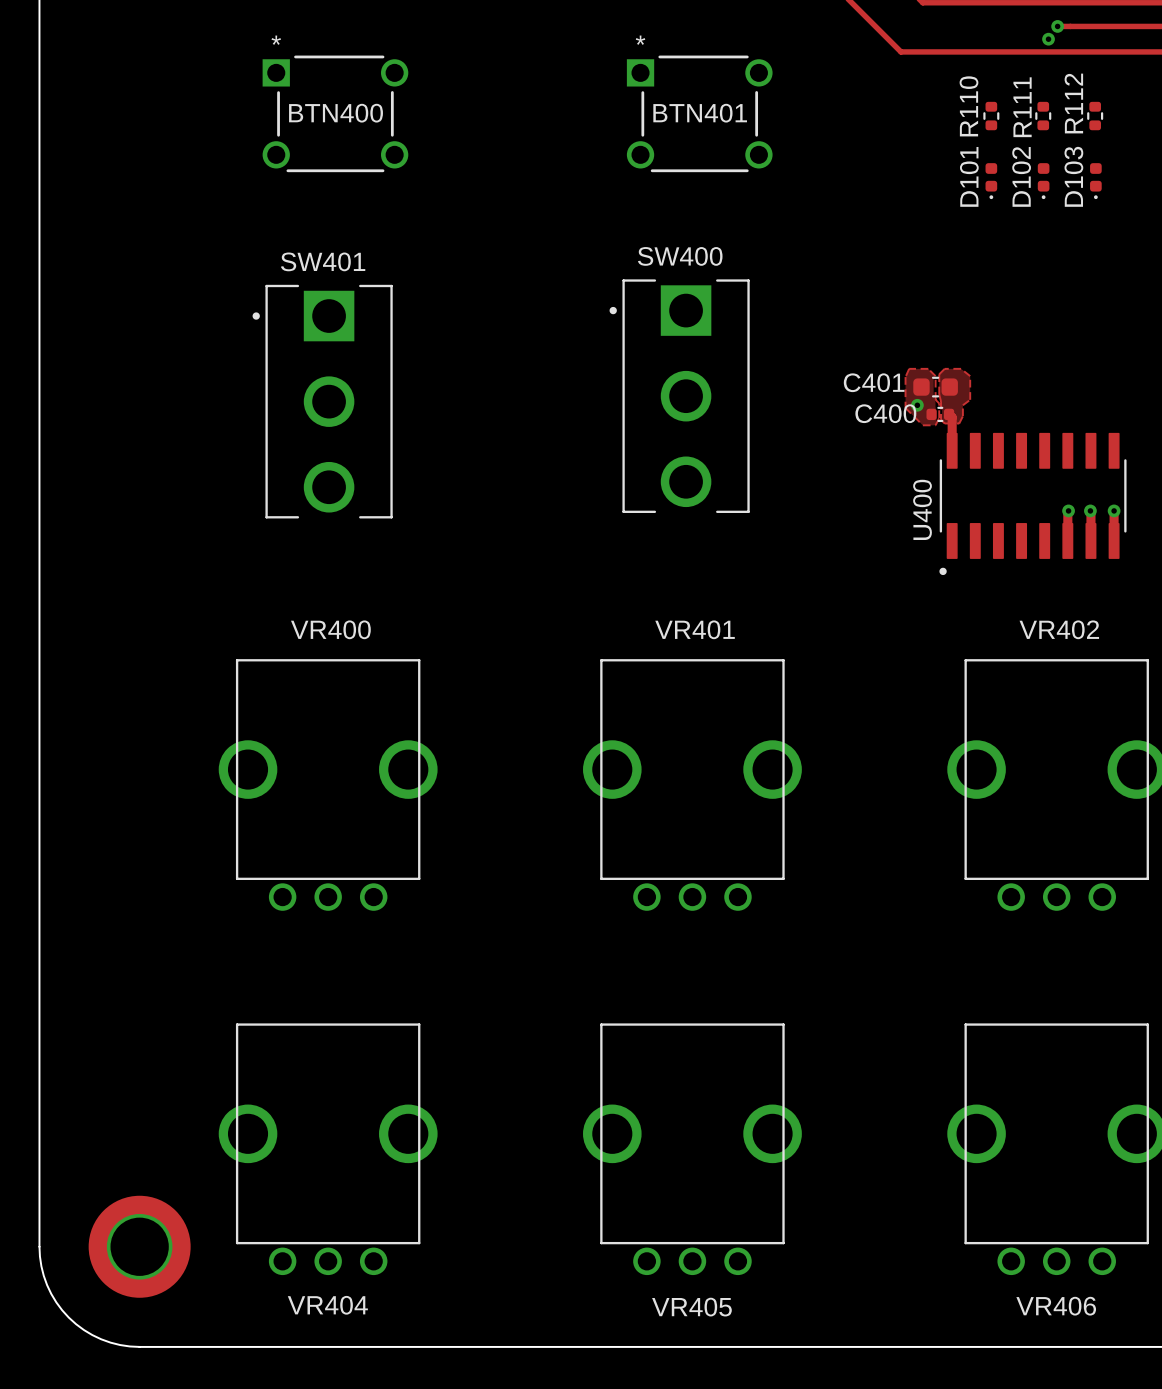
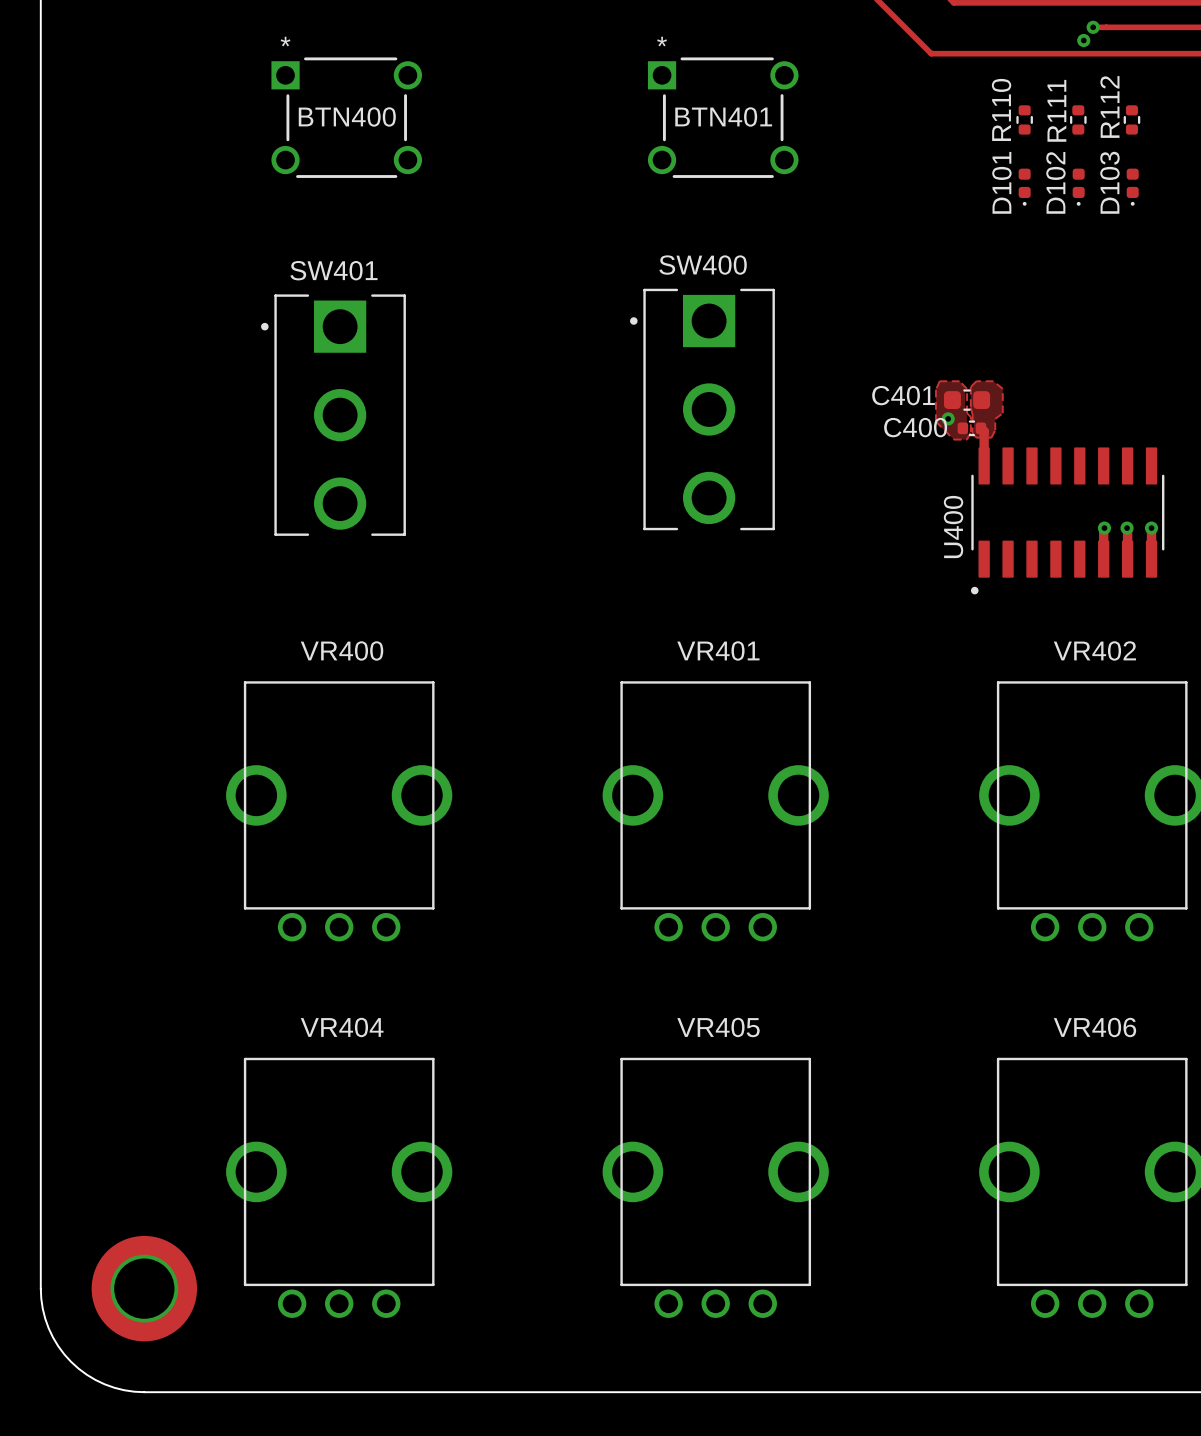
VR404 name position: VR404 (327, 1305) -> VR404 (342, 1027)
VR406 name position: VR406 (1056, 1306) -> VR406 (1094, 1027)
VR405 name position: VR405 (691, 1307) -> VR405 (718, 1027)

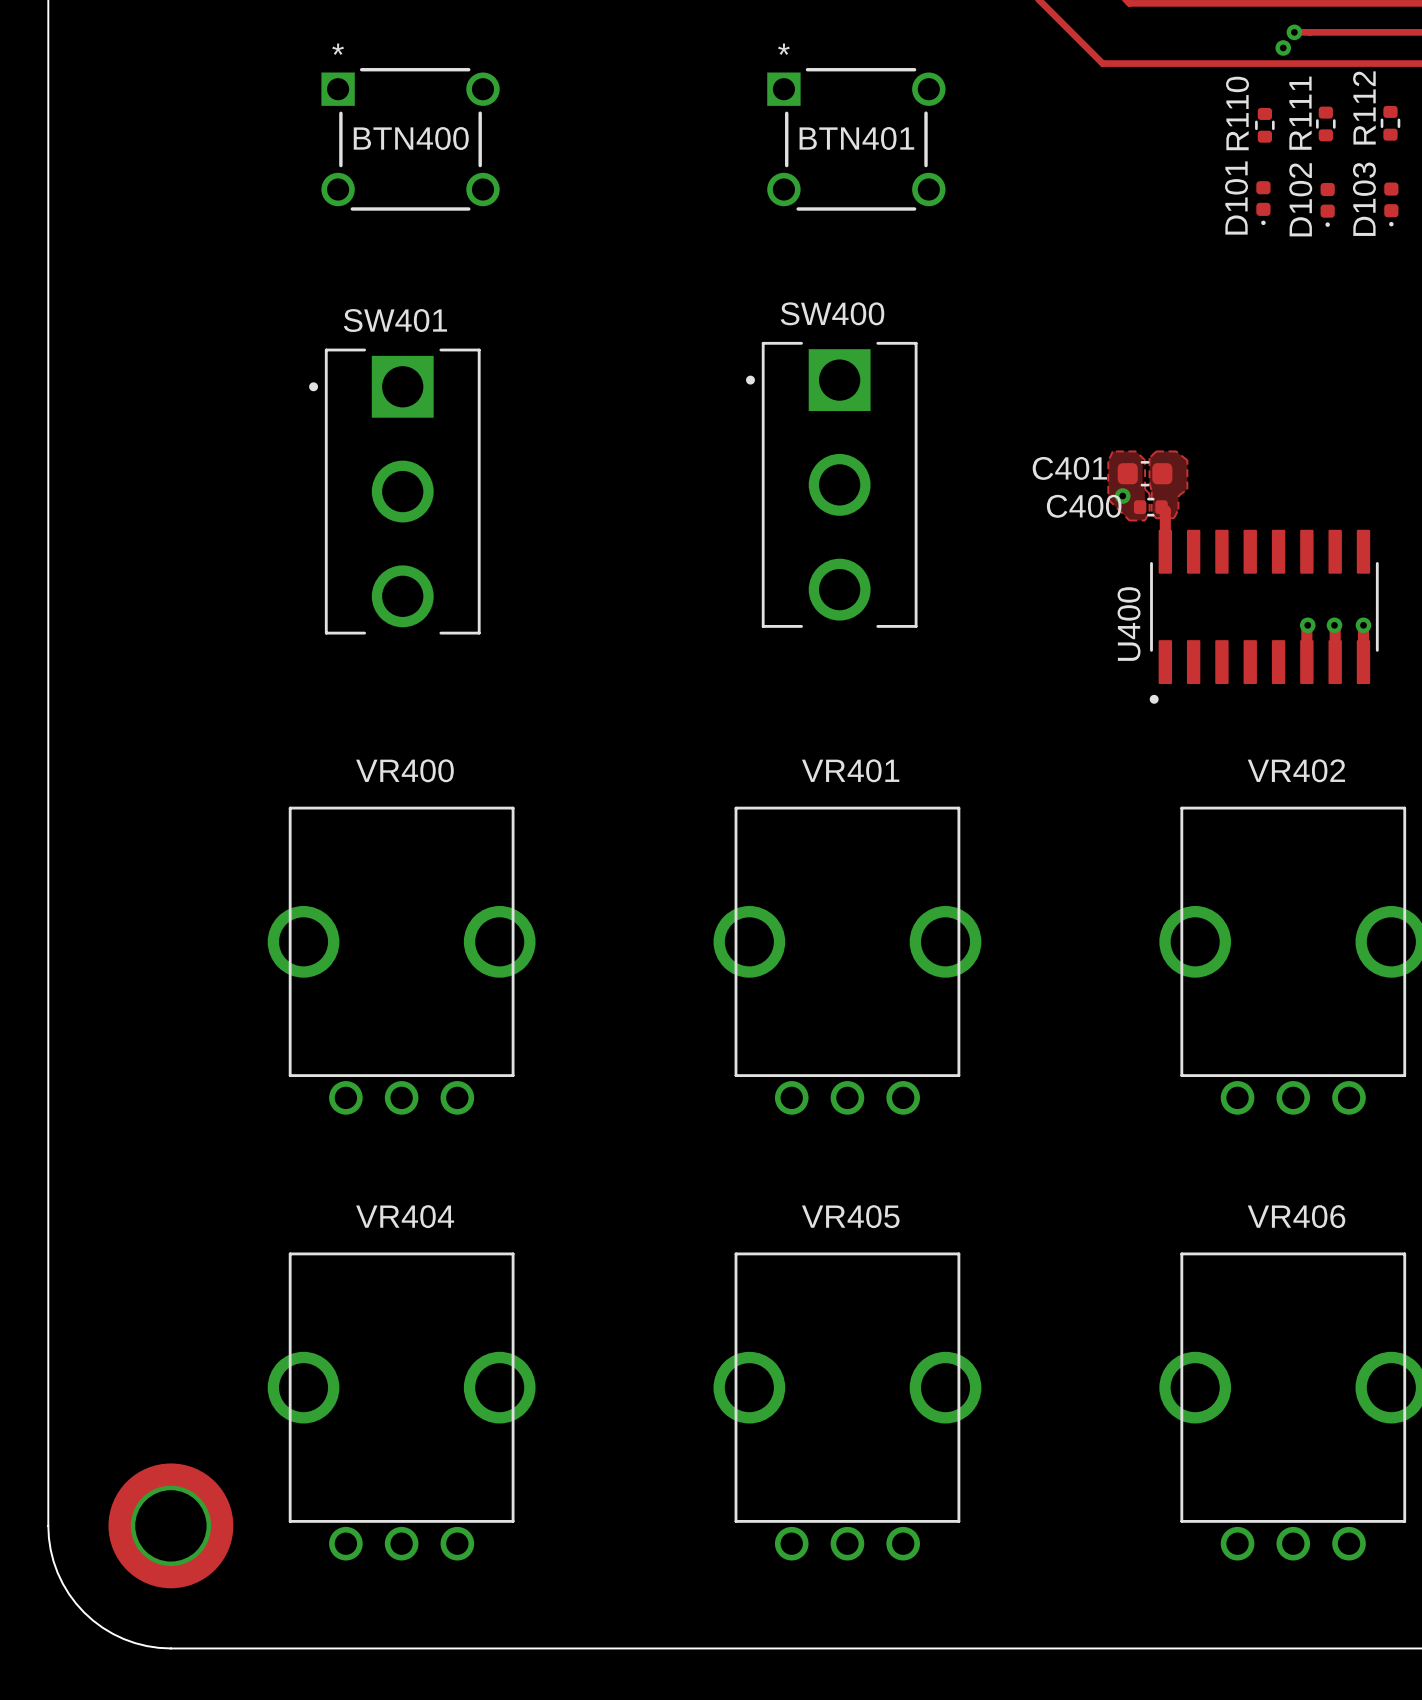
R110 position: (1024, 119) -> (1264, 125)
R111 position: (1078, 119) -> (1325, 123)
R112 position: (1131, 119) -> (1390, 123)
D101 position: (1024, 187) -> (1263, 203)
D102 position: (1078, 187) -> (1327, 204)
D103 position: (1132, 187) -> (1391, 204)

